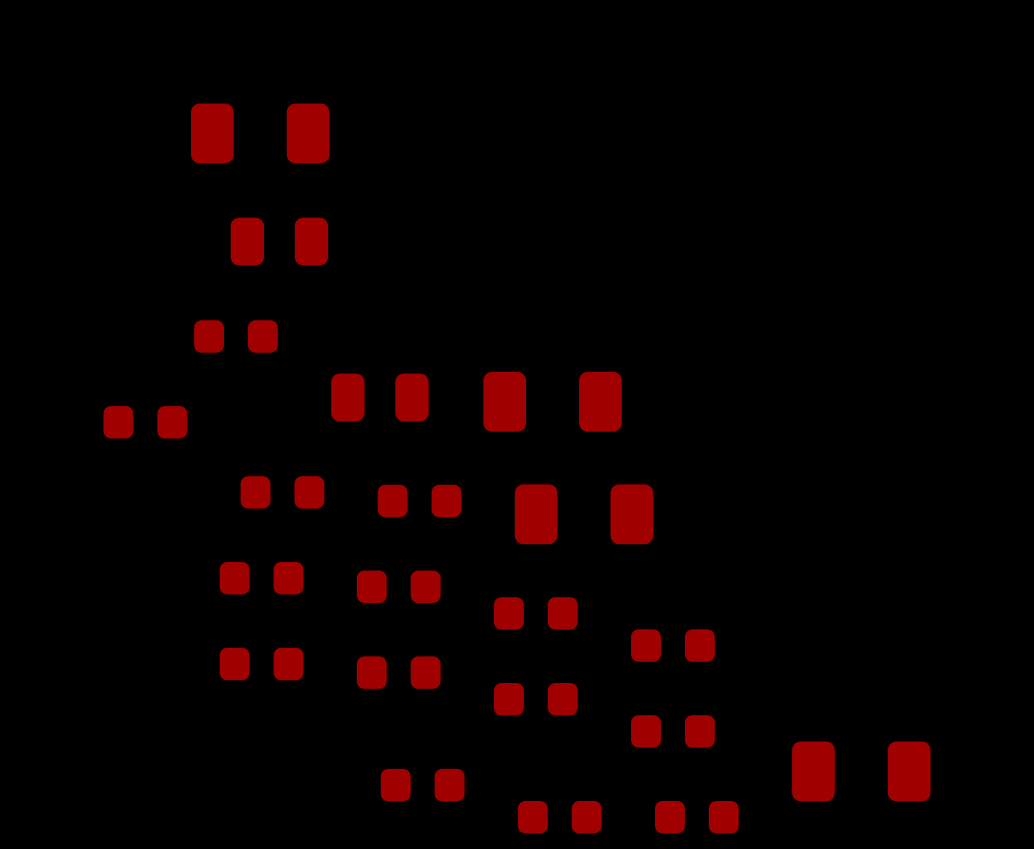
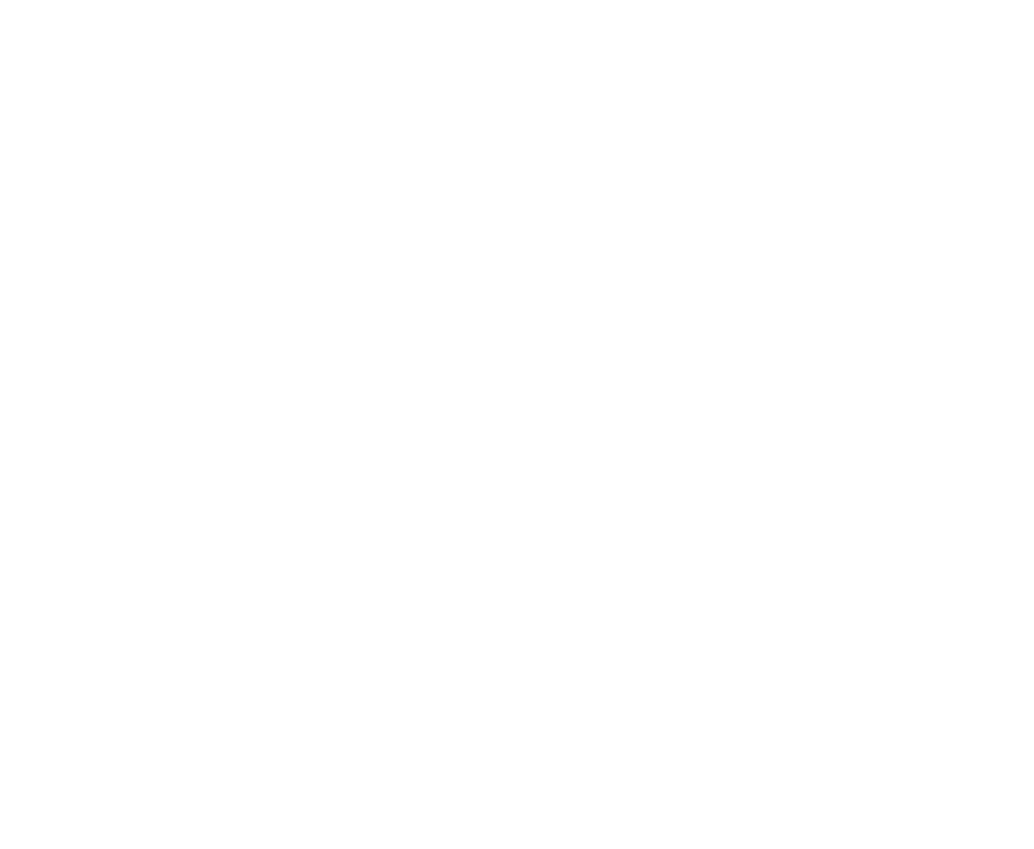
part: (260, 133) -> none
part: (279, 241) -> none
part: (235, 336) -> none
part: (379, 397) -> none
part: (552, 401) -> none
part: (145, 422) -> none
part: (282, 492) -> none
part: (419, 500) -> none
part: (584, 514) -> none
part: (261, 578) -> none
part: (398, 586) -> none
part: (535, 613) -> none
part: (672, 645) -> none
part: (261, 664) -> none
part: (398, 672) -> none
part: (535, 699) -> none
part: (672, 731) -> none
part: (861, 771) -> none
part: (422, 785) -> none
part: (559, 817) -> none
part: (696, 817) -> none

